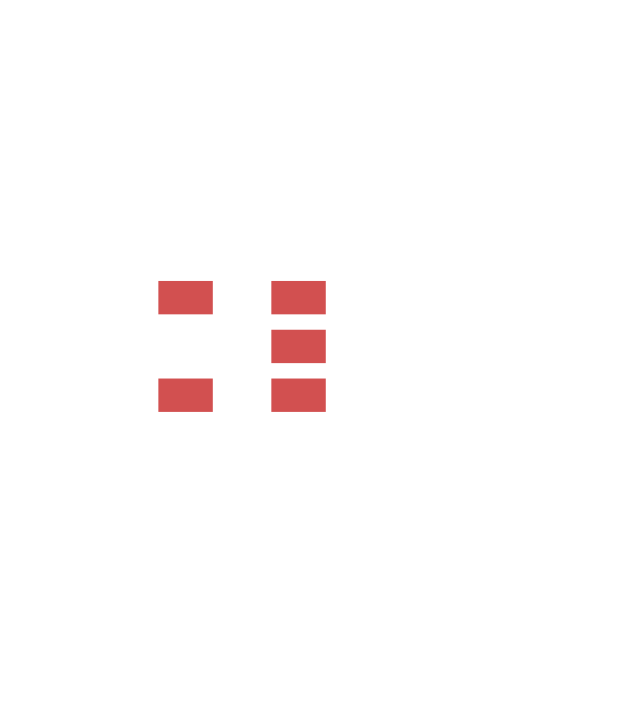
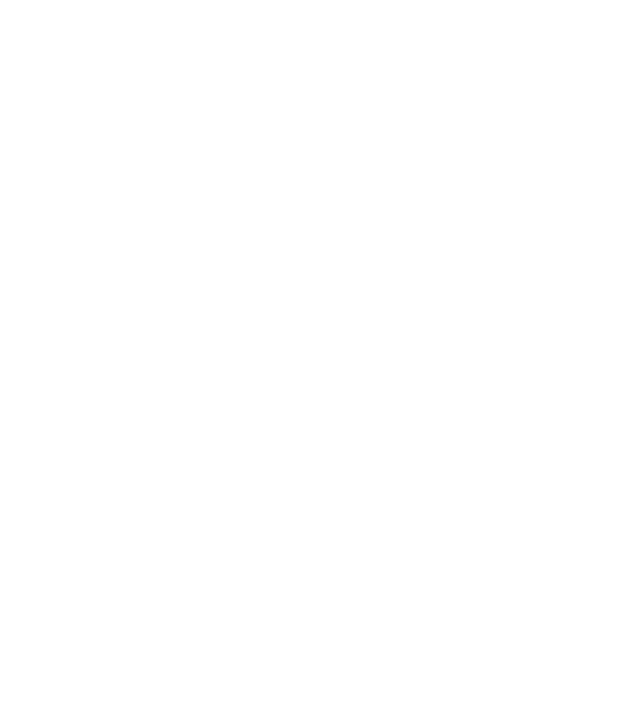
part: (242, 346) -> none

